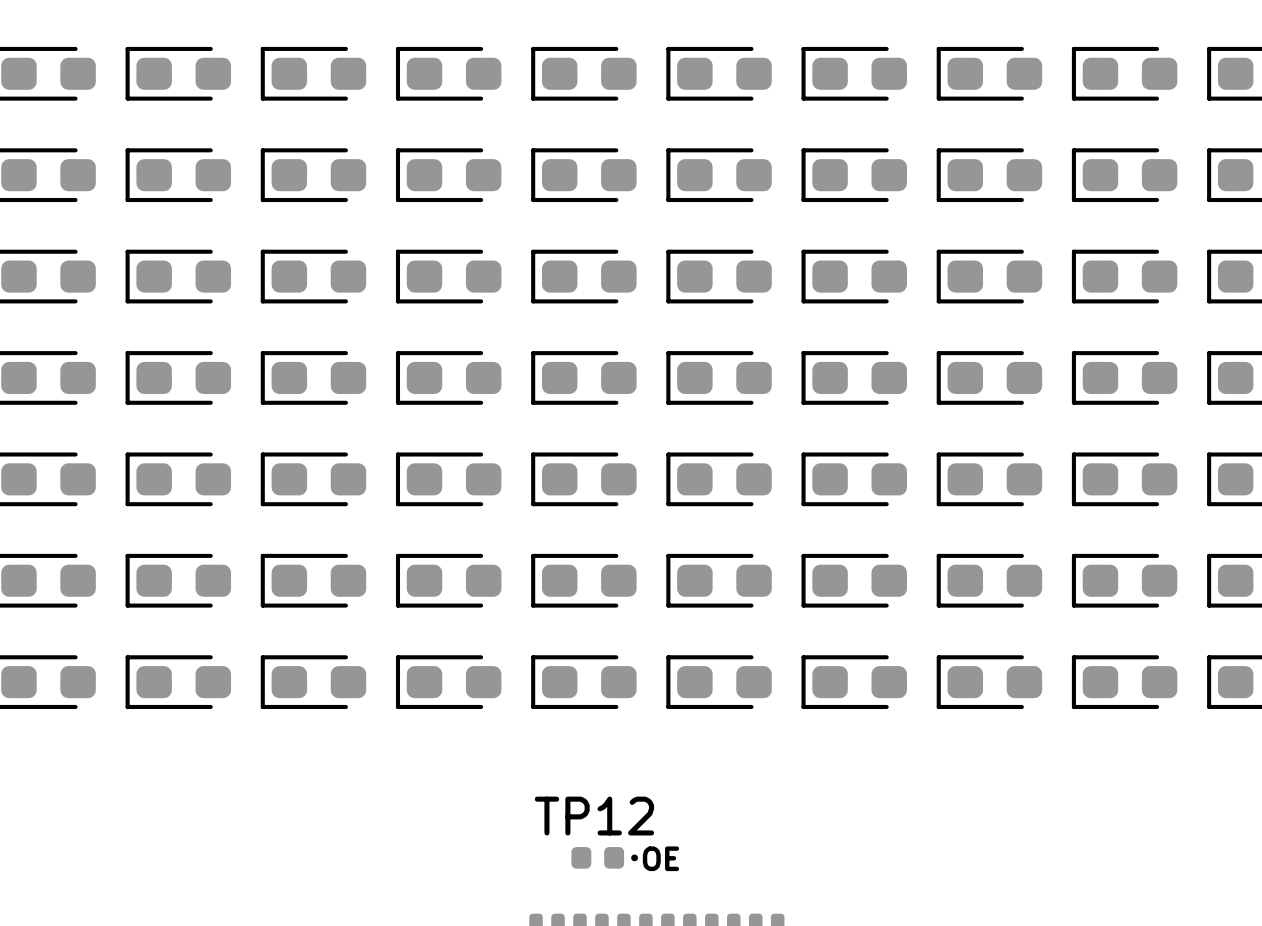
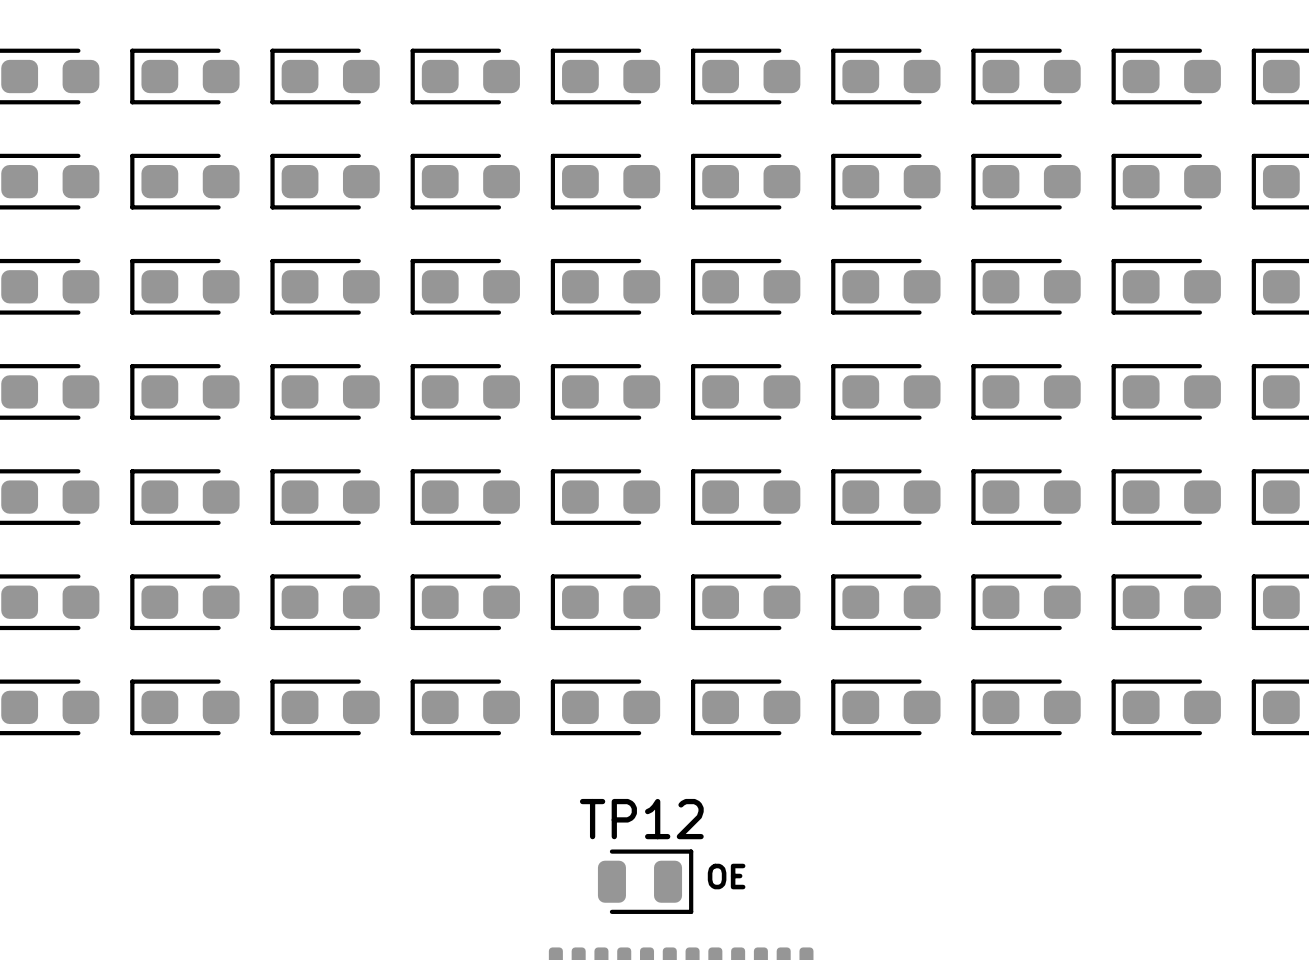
TP12 footprint: [571, 847, 638, 869] -> [597, 849, 694, 914]
text position: OE (660, 858) -> OE (726, 876)

